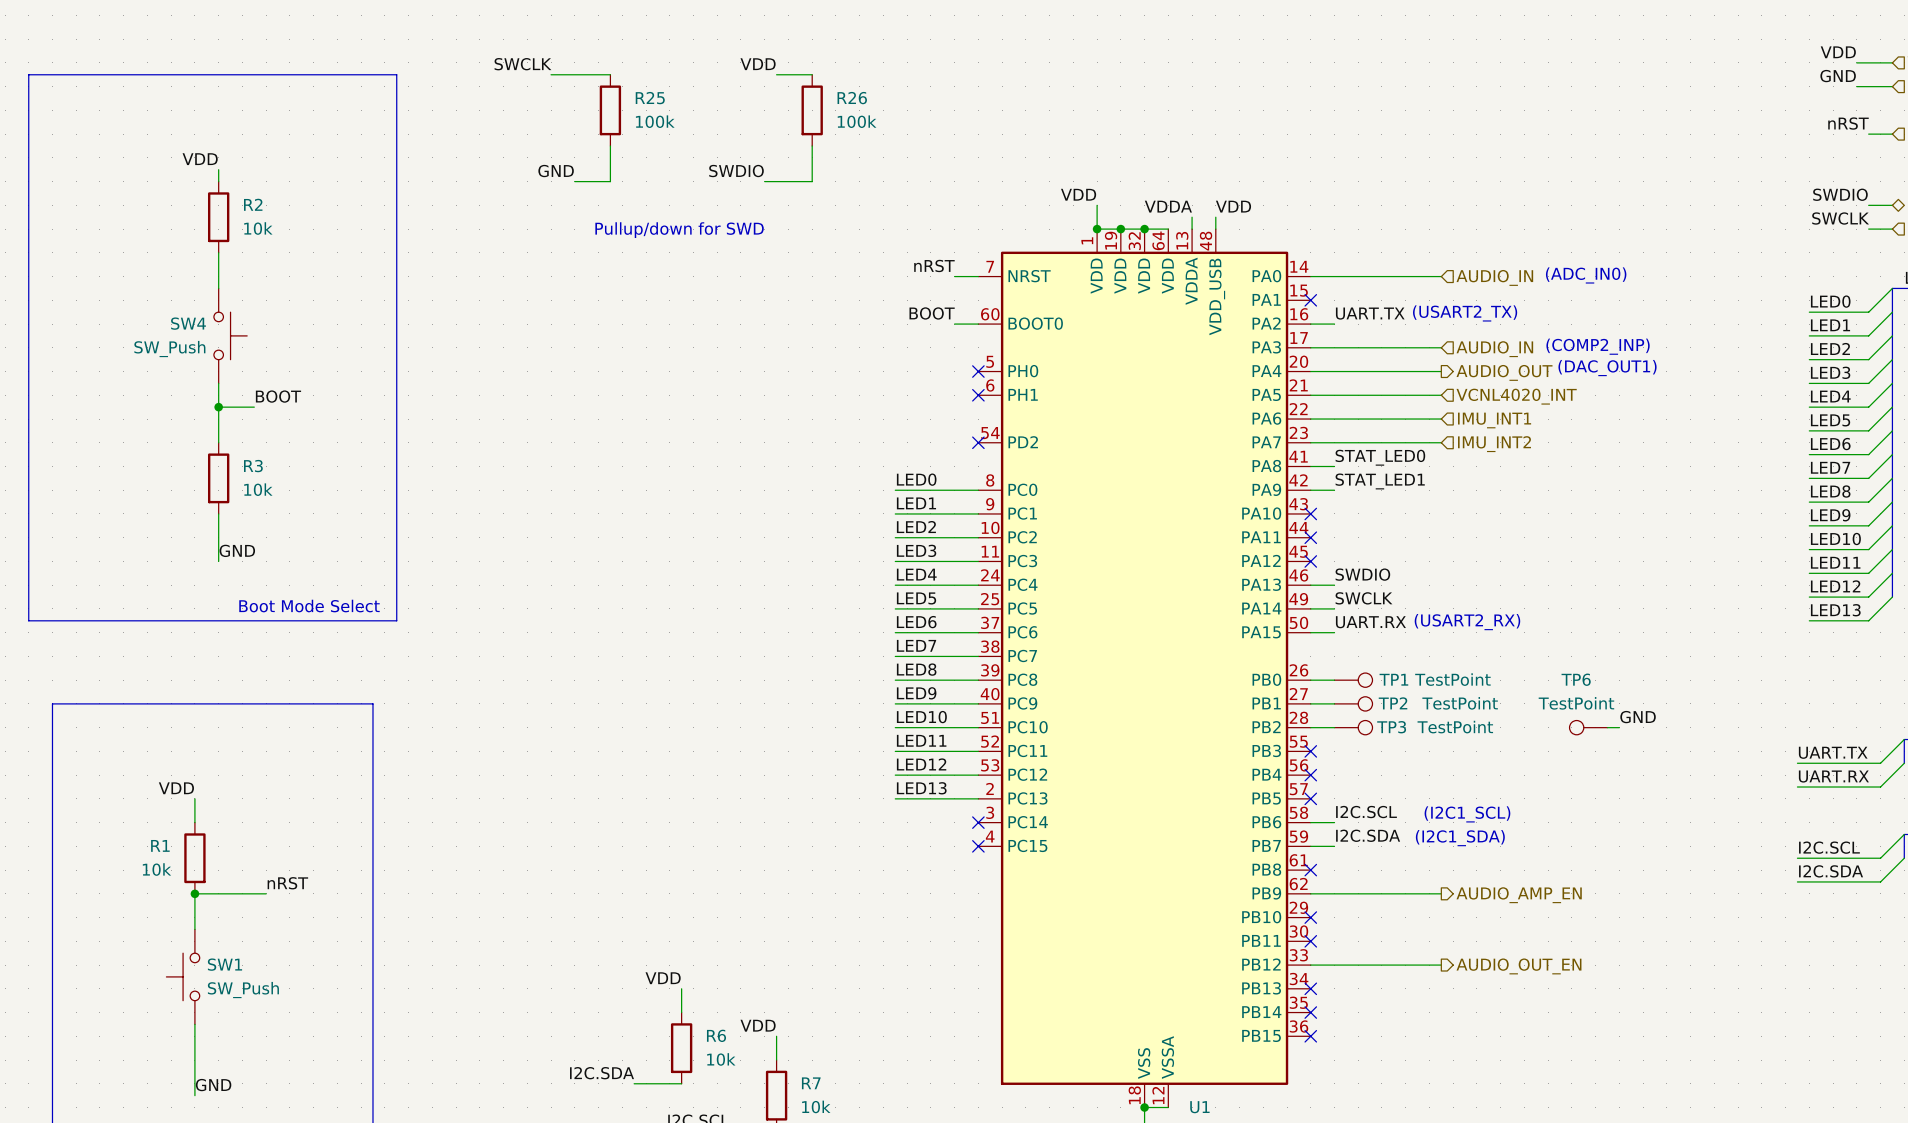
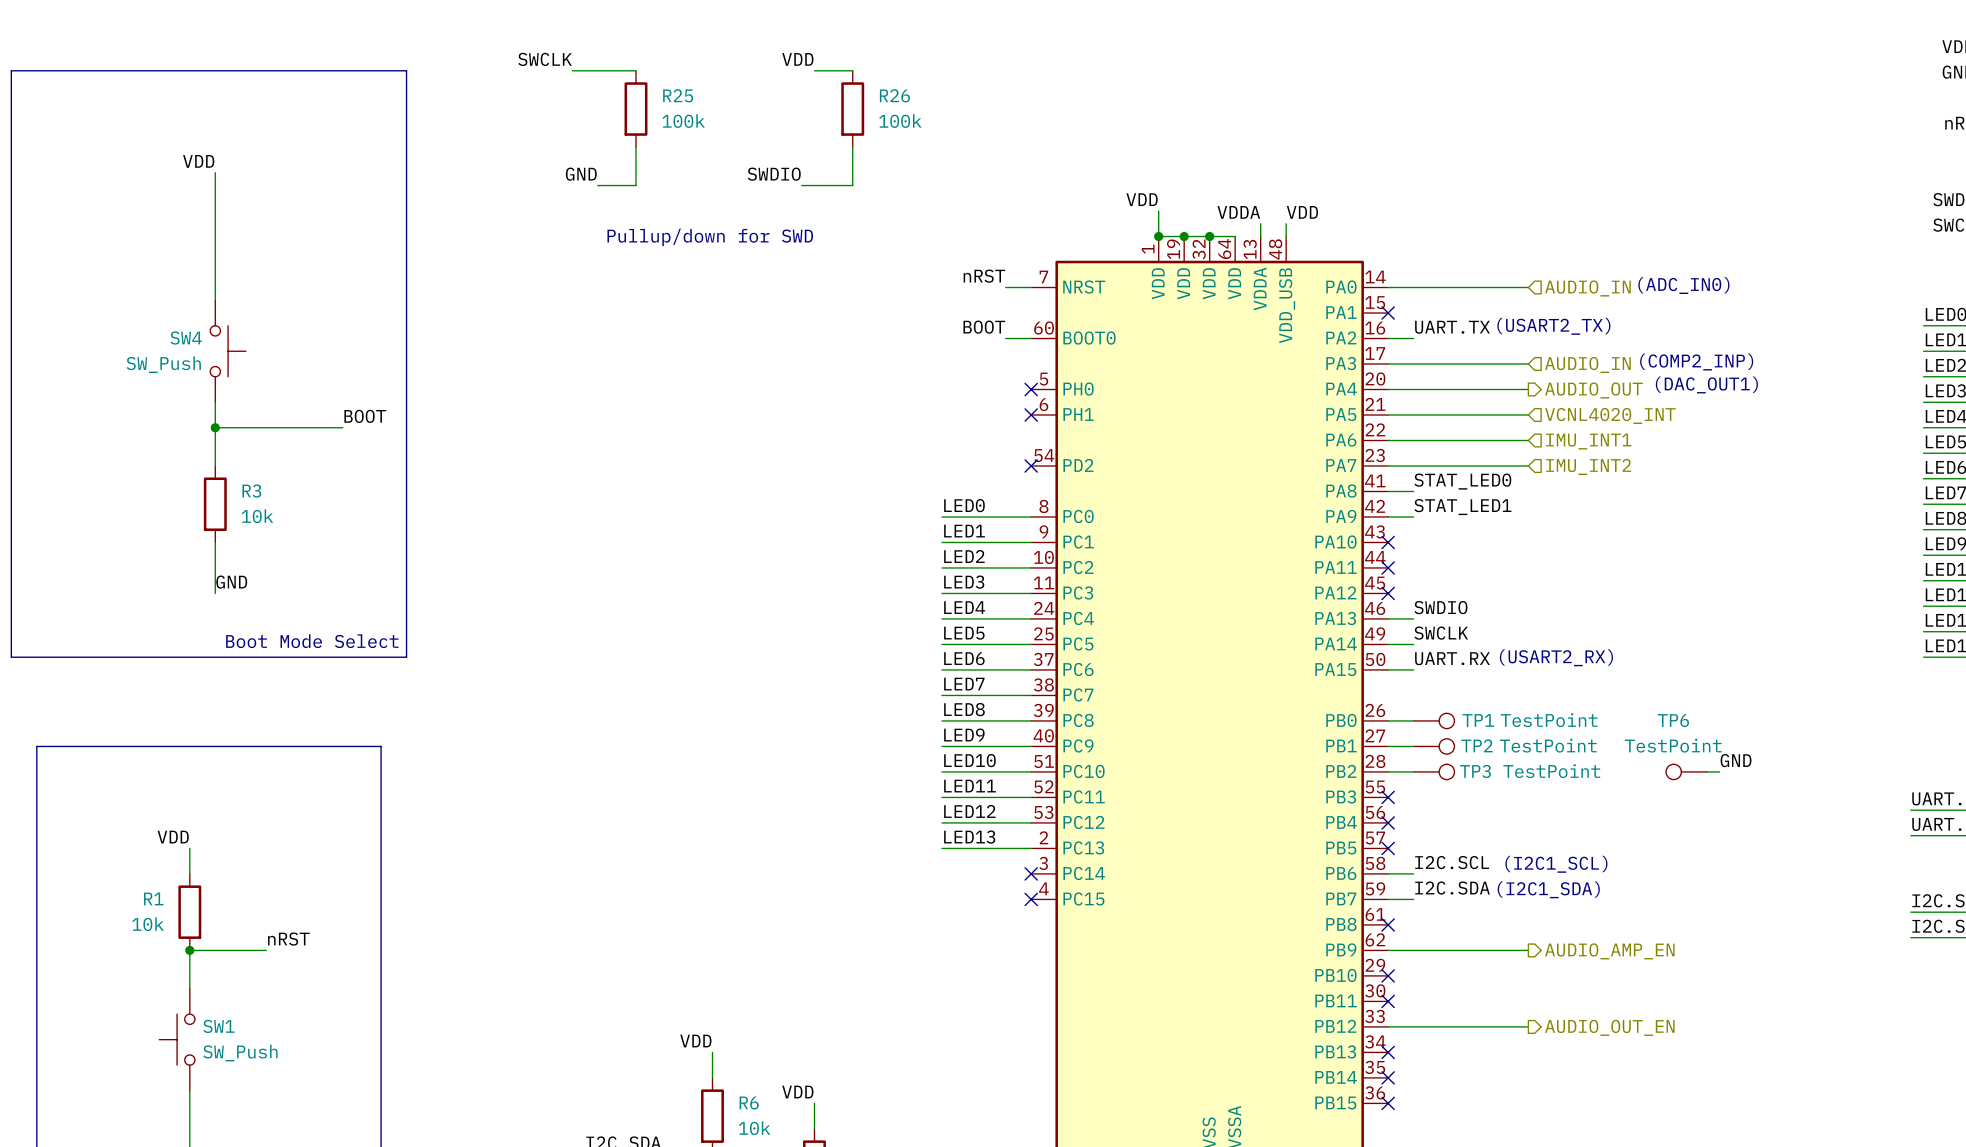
wire: none -> (215, 185) (215, 262)
R2: 10k (218, 217) -> none
label position: BOOT (278, 396) -> BOOT (365, 416)
wire: none -> (253, 427) (342, 427)

